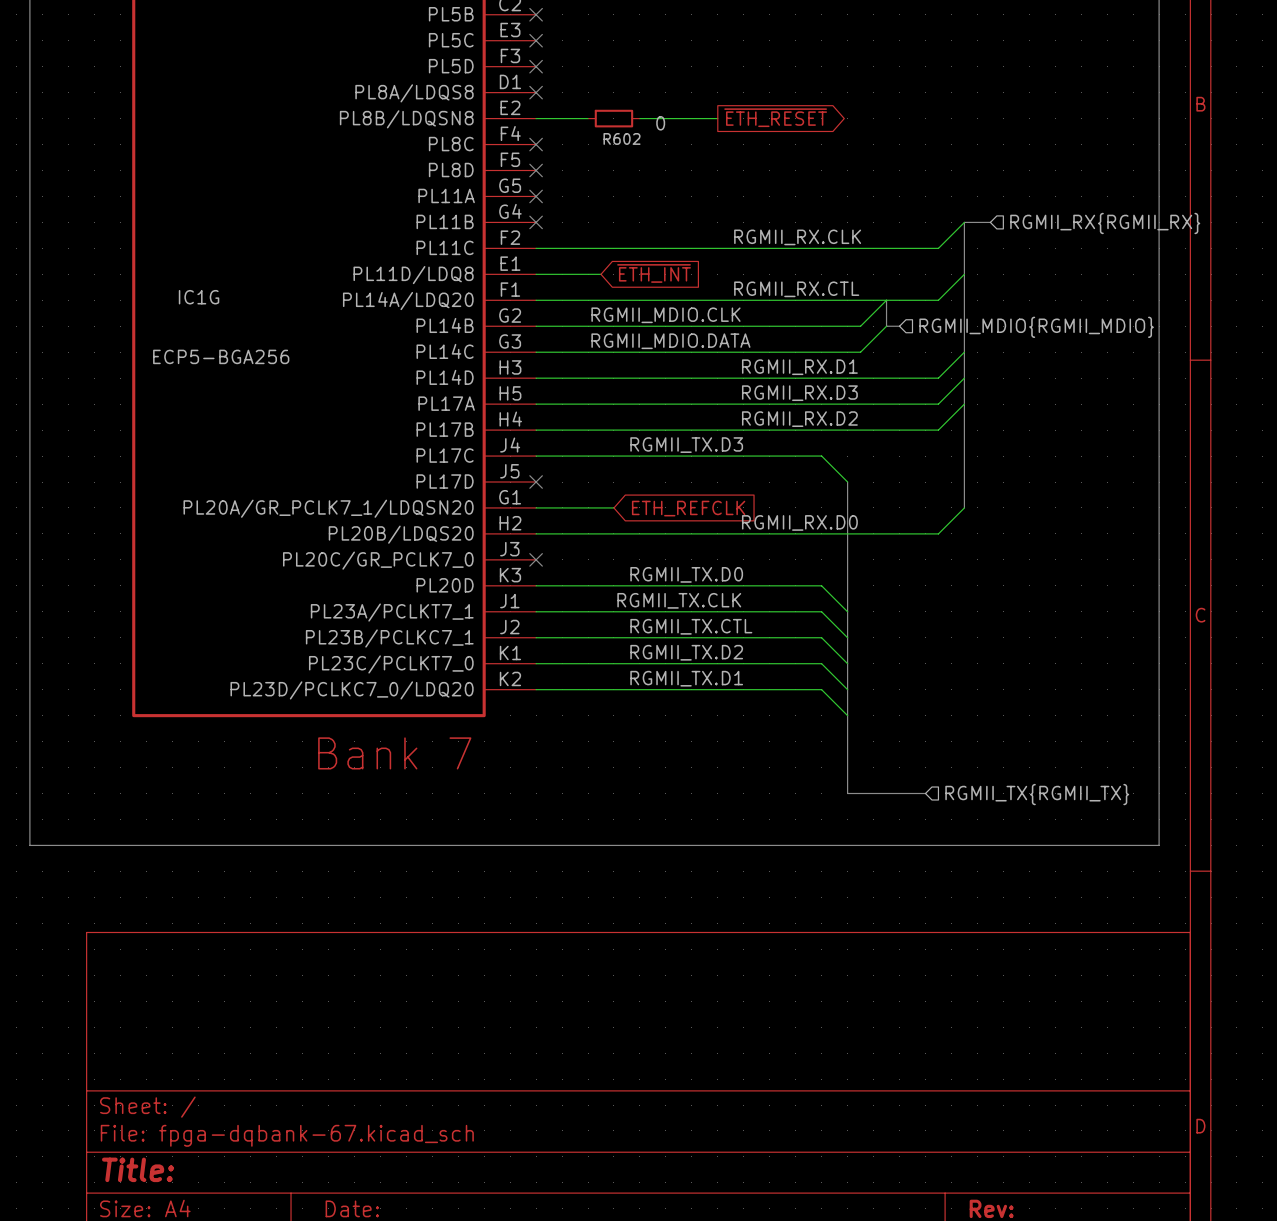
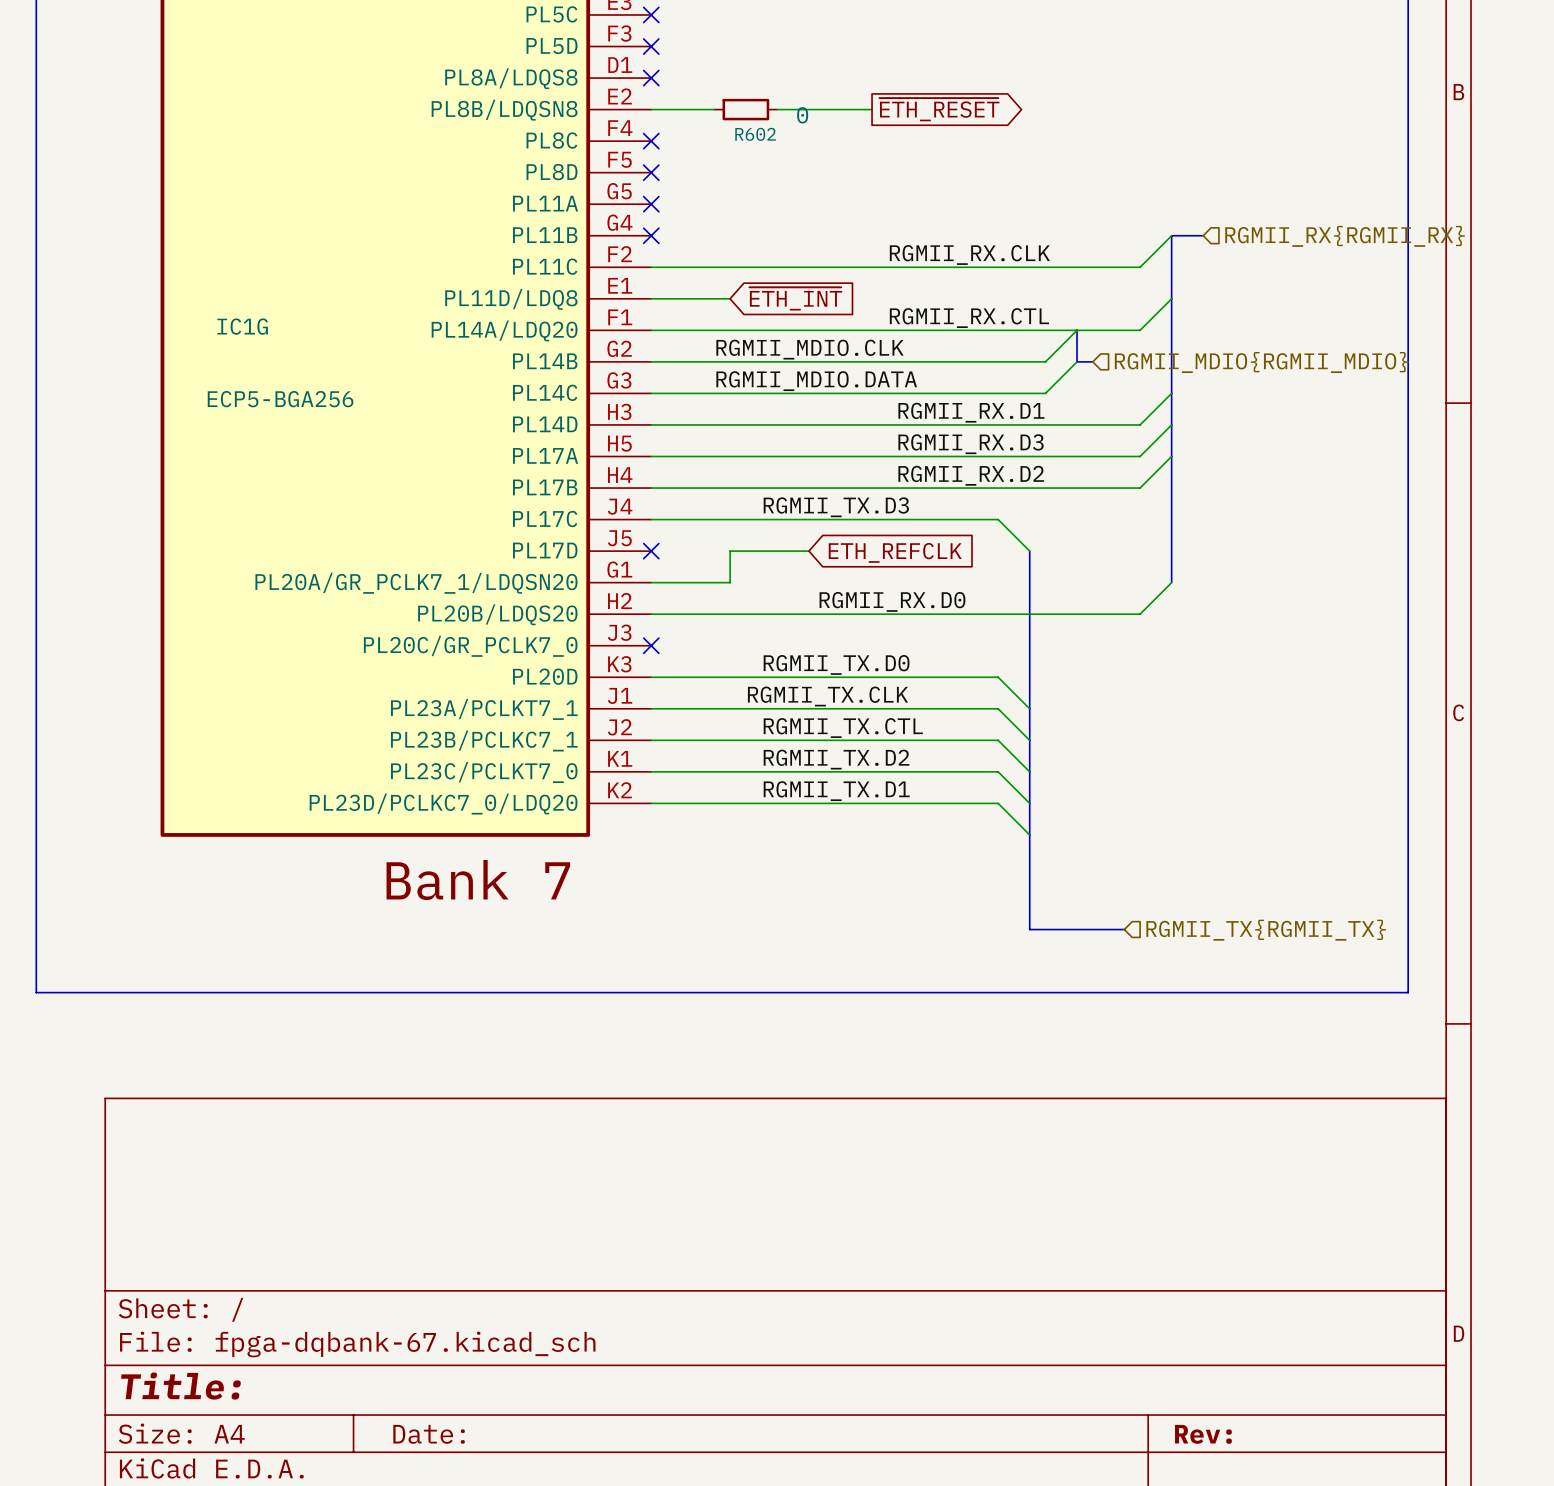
wire: (600, 507) (613, 507) -> (730, 582) (730, 551) (808, 551)
global label position: ETH_REFCLK (688, 508) -> ETH_REFCLK (895, 552)
label position: RGMII_RX.D0 (799, 522) -> RGMII_RX.D0 (892, 601)

